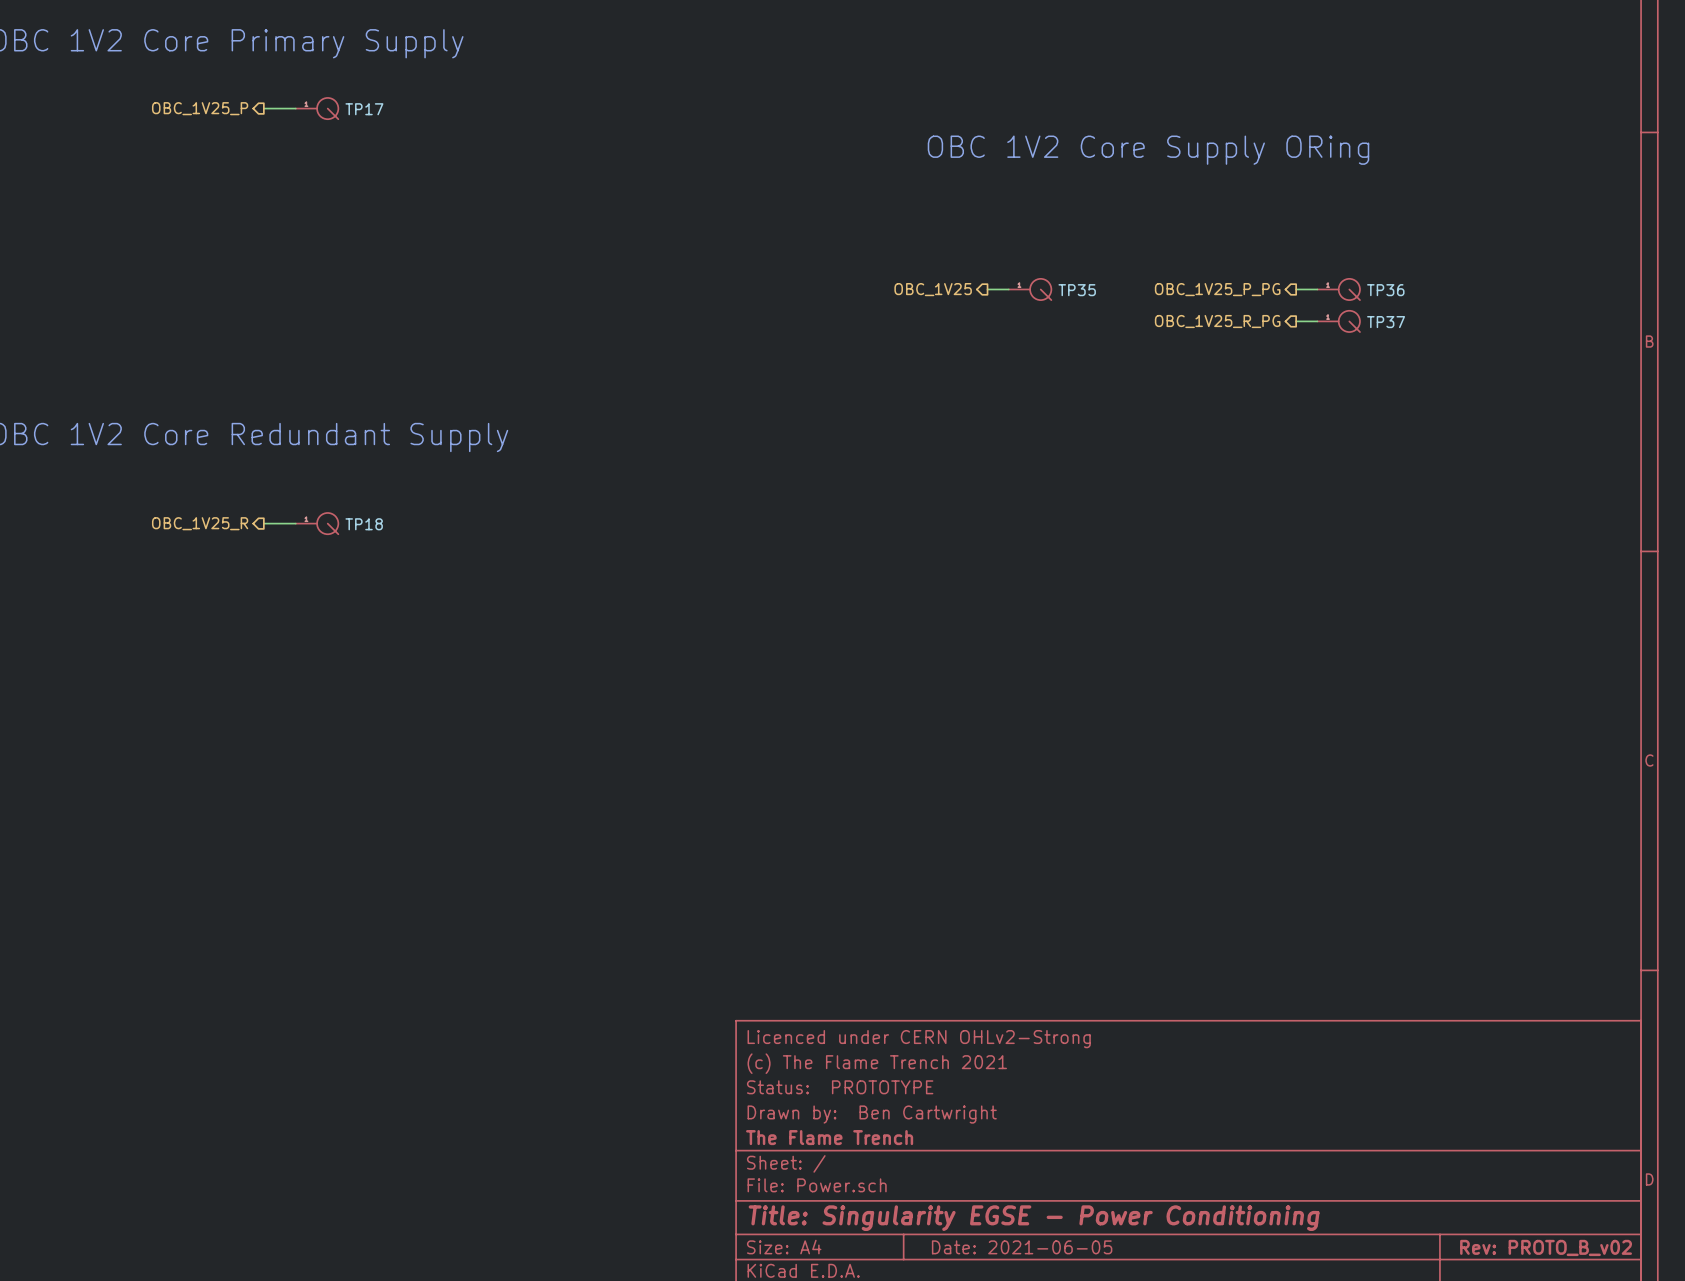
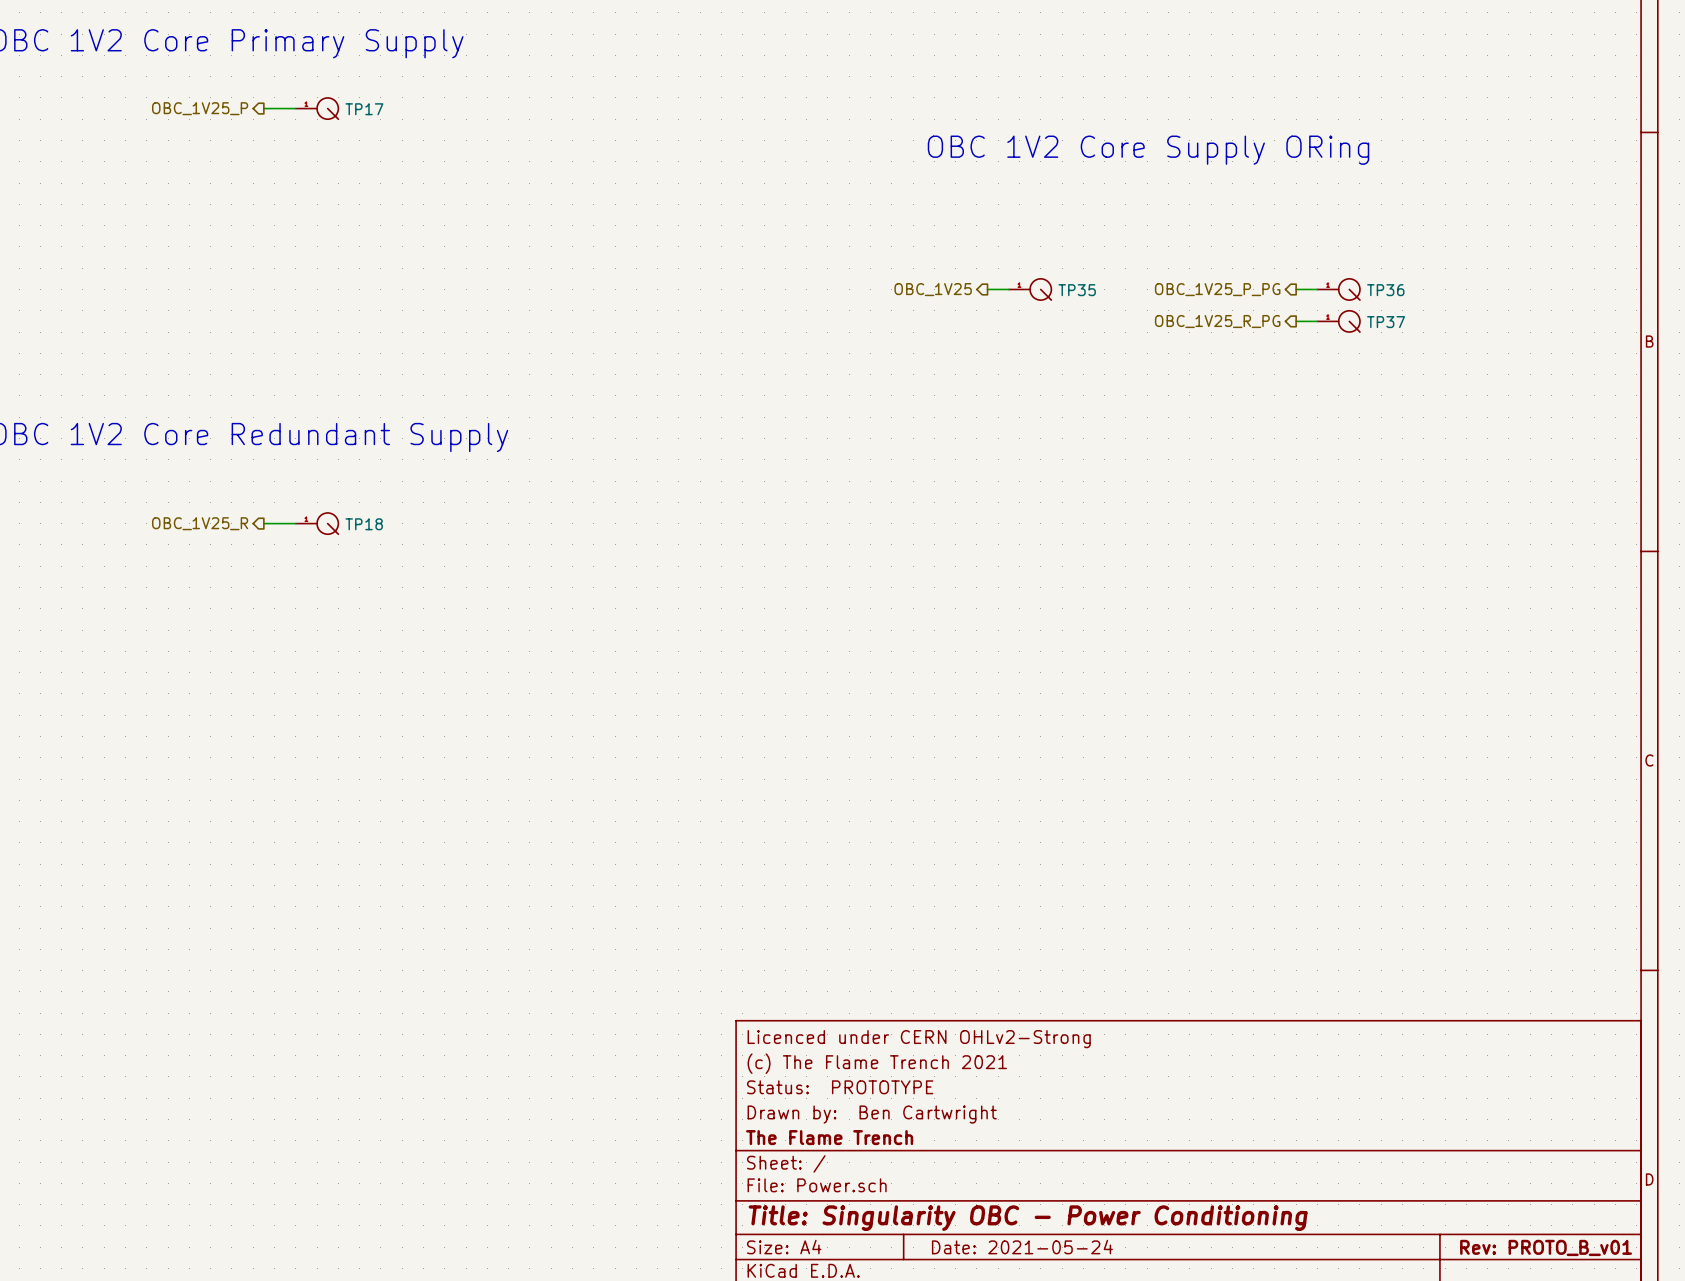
title block: Title: Singularity EGSE - Power Conditioning (1034, 1218) -> Title: Singularity OBC - Power Conditioning (1028, 1218)
title block: Date: 2021-06-05 (1022, 1247) -> Date: 2021-05-24 (1022, 1247)
title block: Rev: PROTO_B_v02 (1546, 1247) -> Rev: PROTO_B_v01 (1546, 1247)

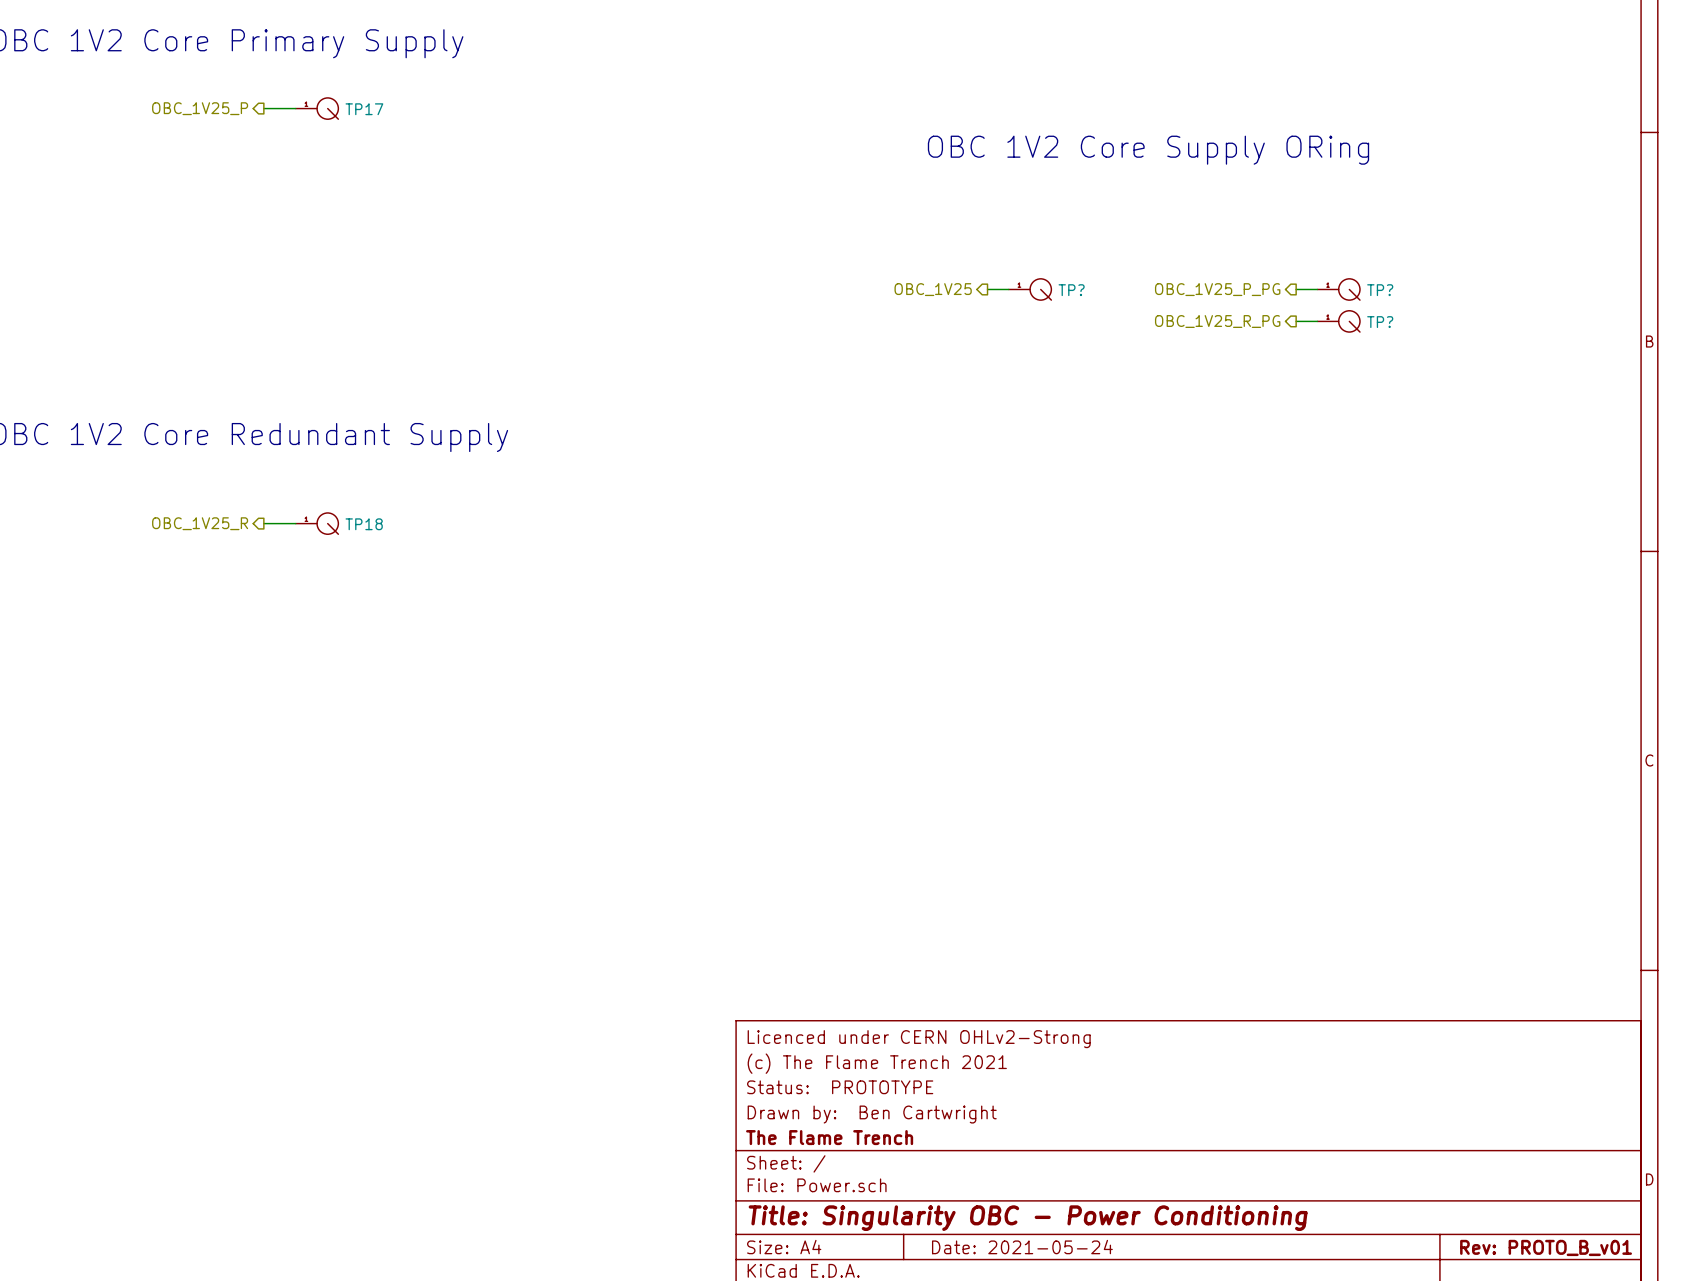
TP35 name: TP35 (1077, 290) -> TP? (1071, 290)
TP36 name: TP36 (1385, 290) -> TP? (1380, 290)
TP37 name: TP37 (1386, 322) -> TP? (1380, 322)

